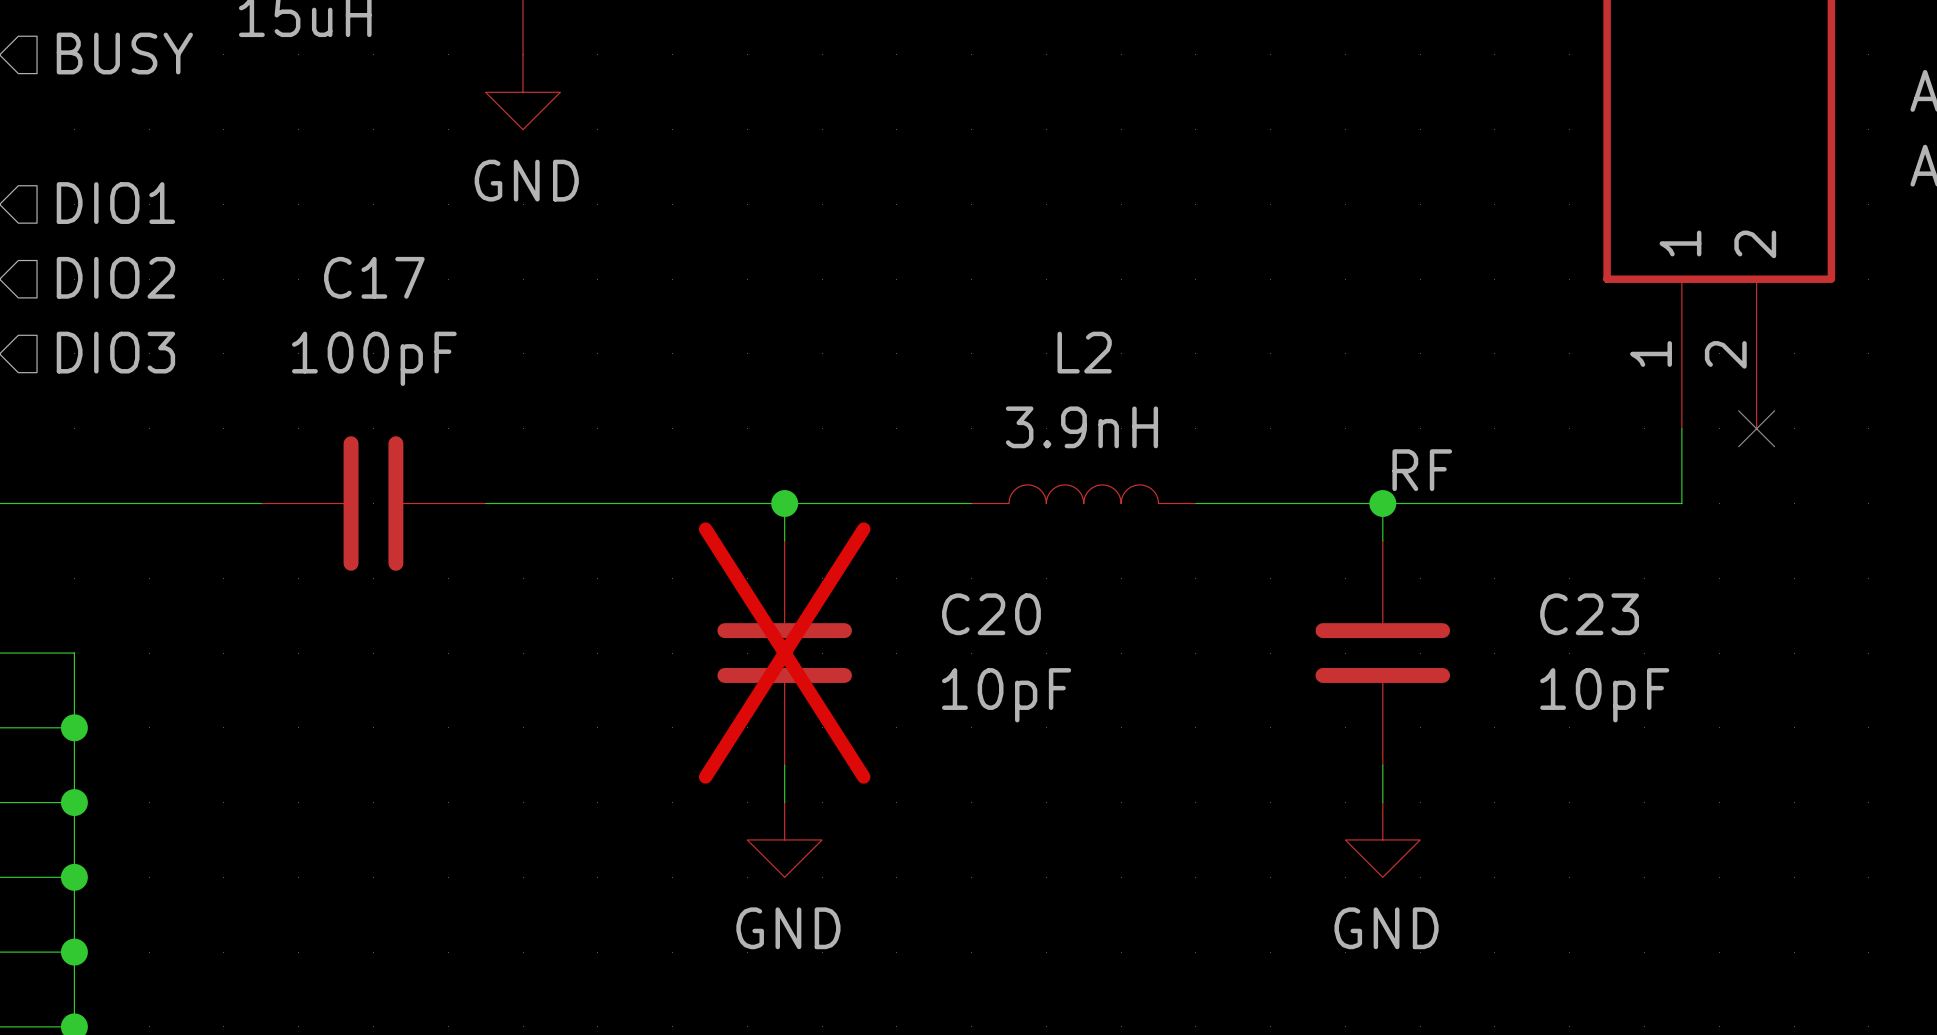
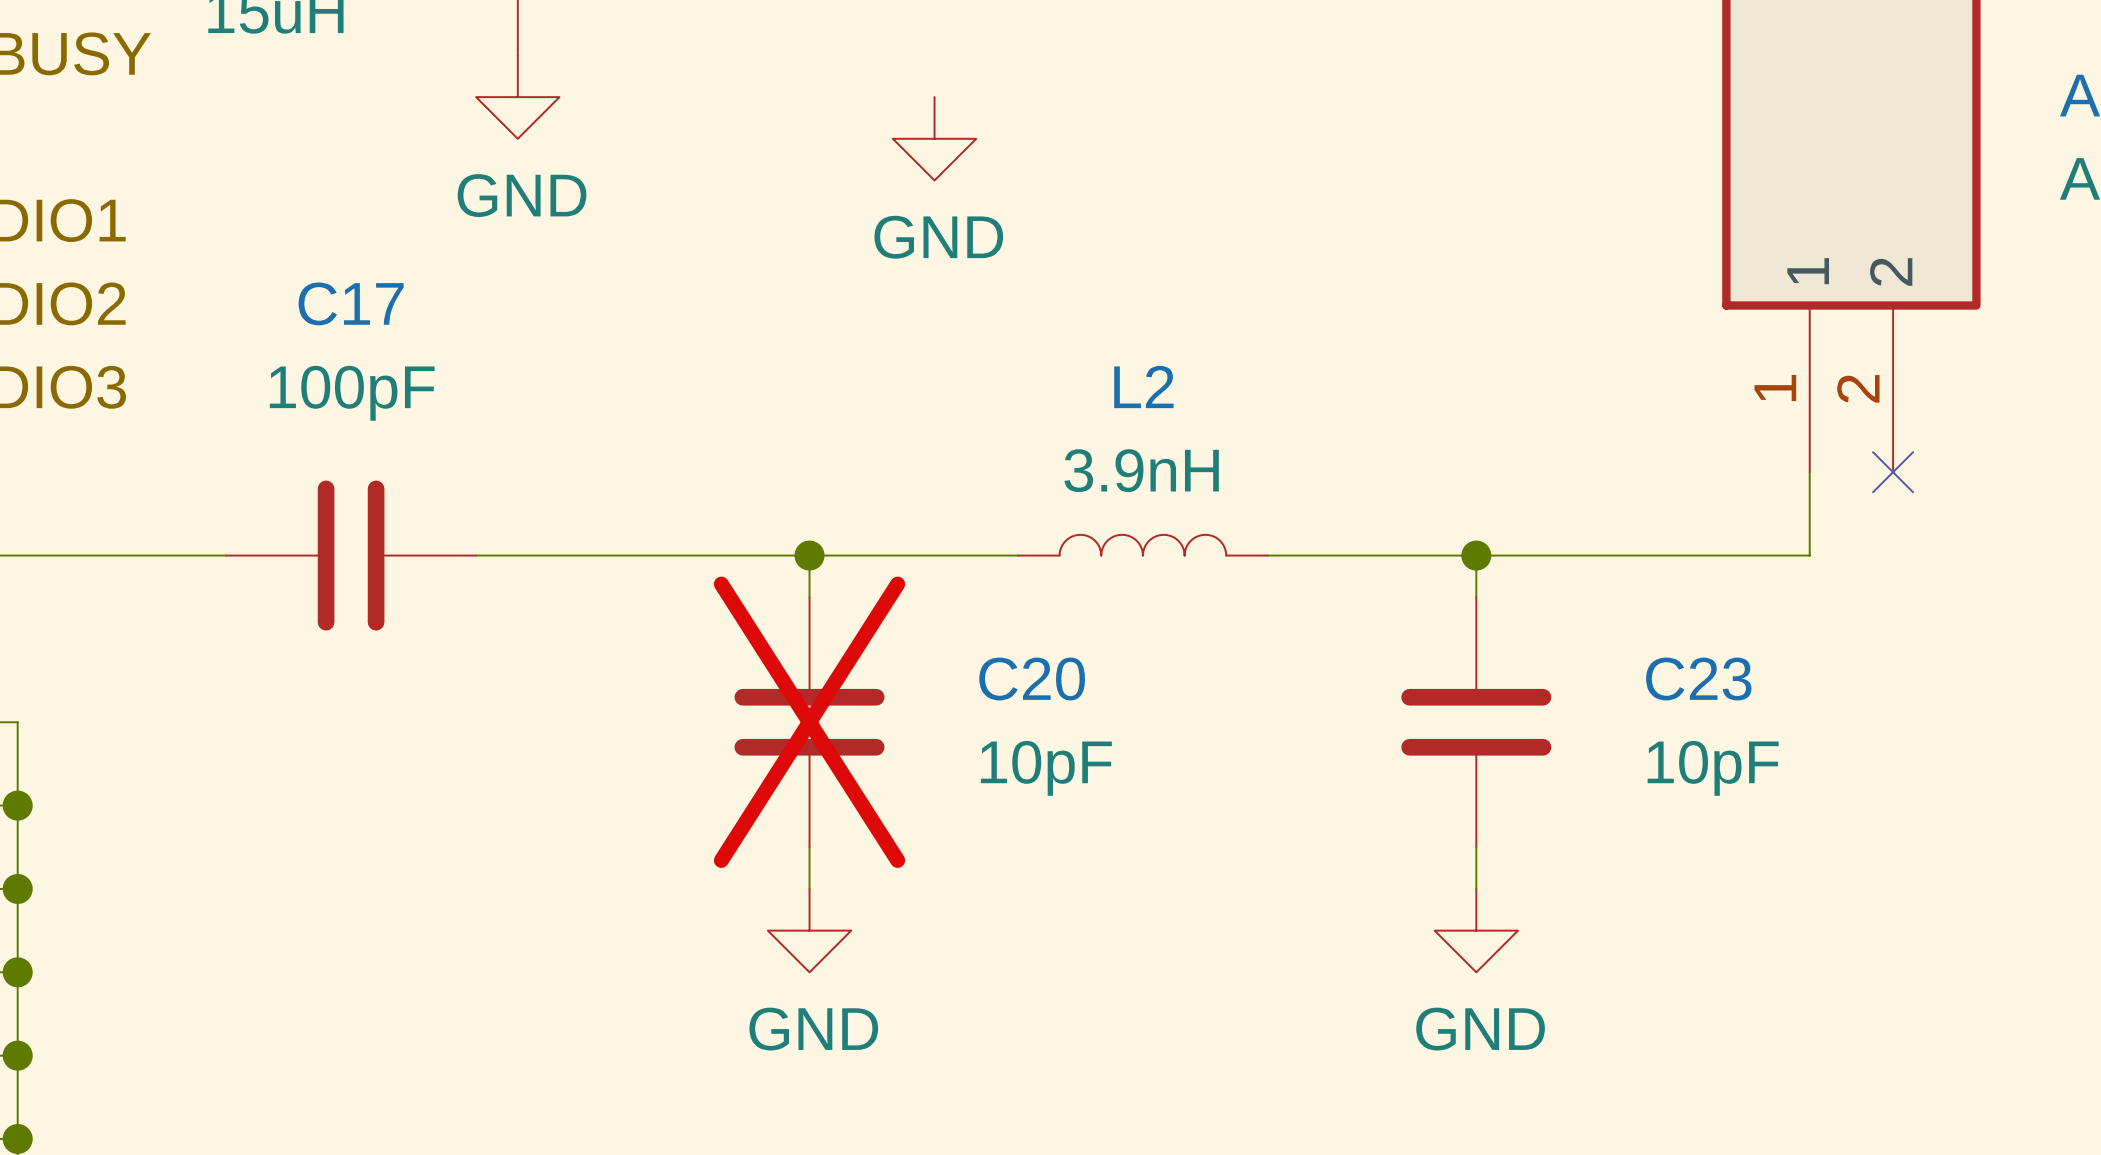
power symbol: none -> GND (934, 138)
label: RF (1422, 470) -> none

